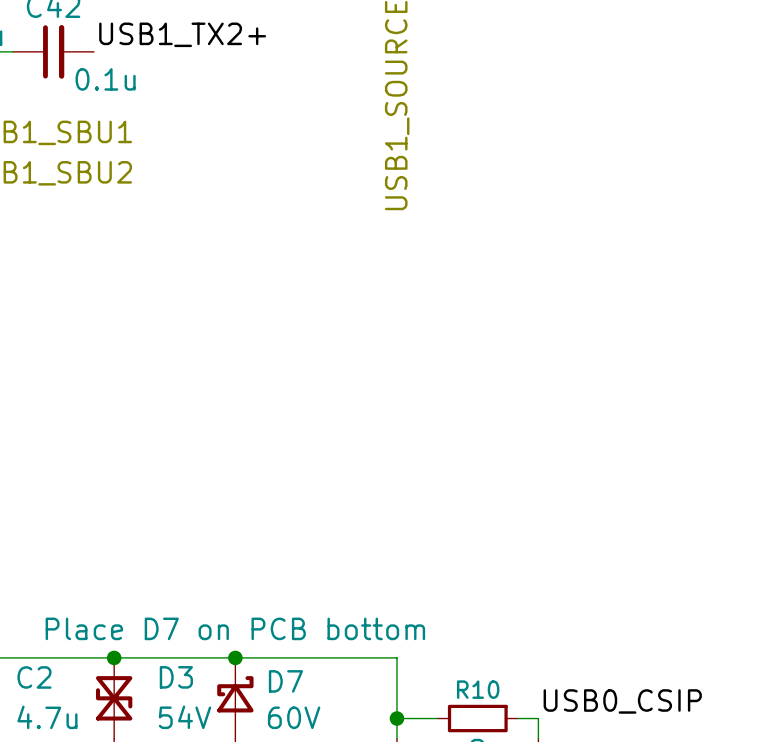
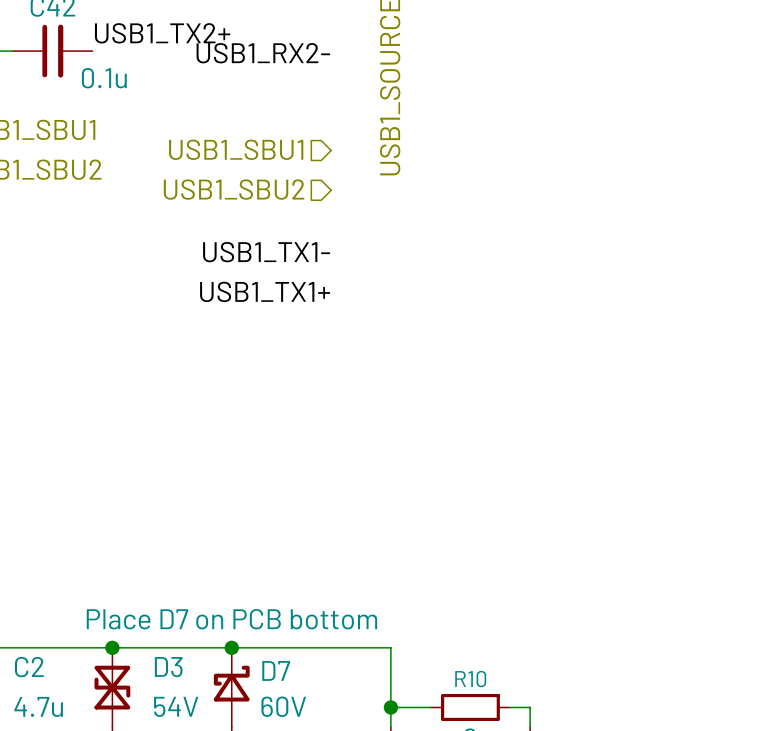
label: none -> USB1_RX2- (263, 53)
hierarchical label: none -> USB1_SBU1 (236, 149)
hierarchical label: none -> USB1_SBU2 (234, 189)
label: none -> USB1_TX1- (266, 252)
label: none -> USB1_TX1+ (265, 291)
label: USB0_CSIP (622, 701) -> none

